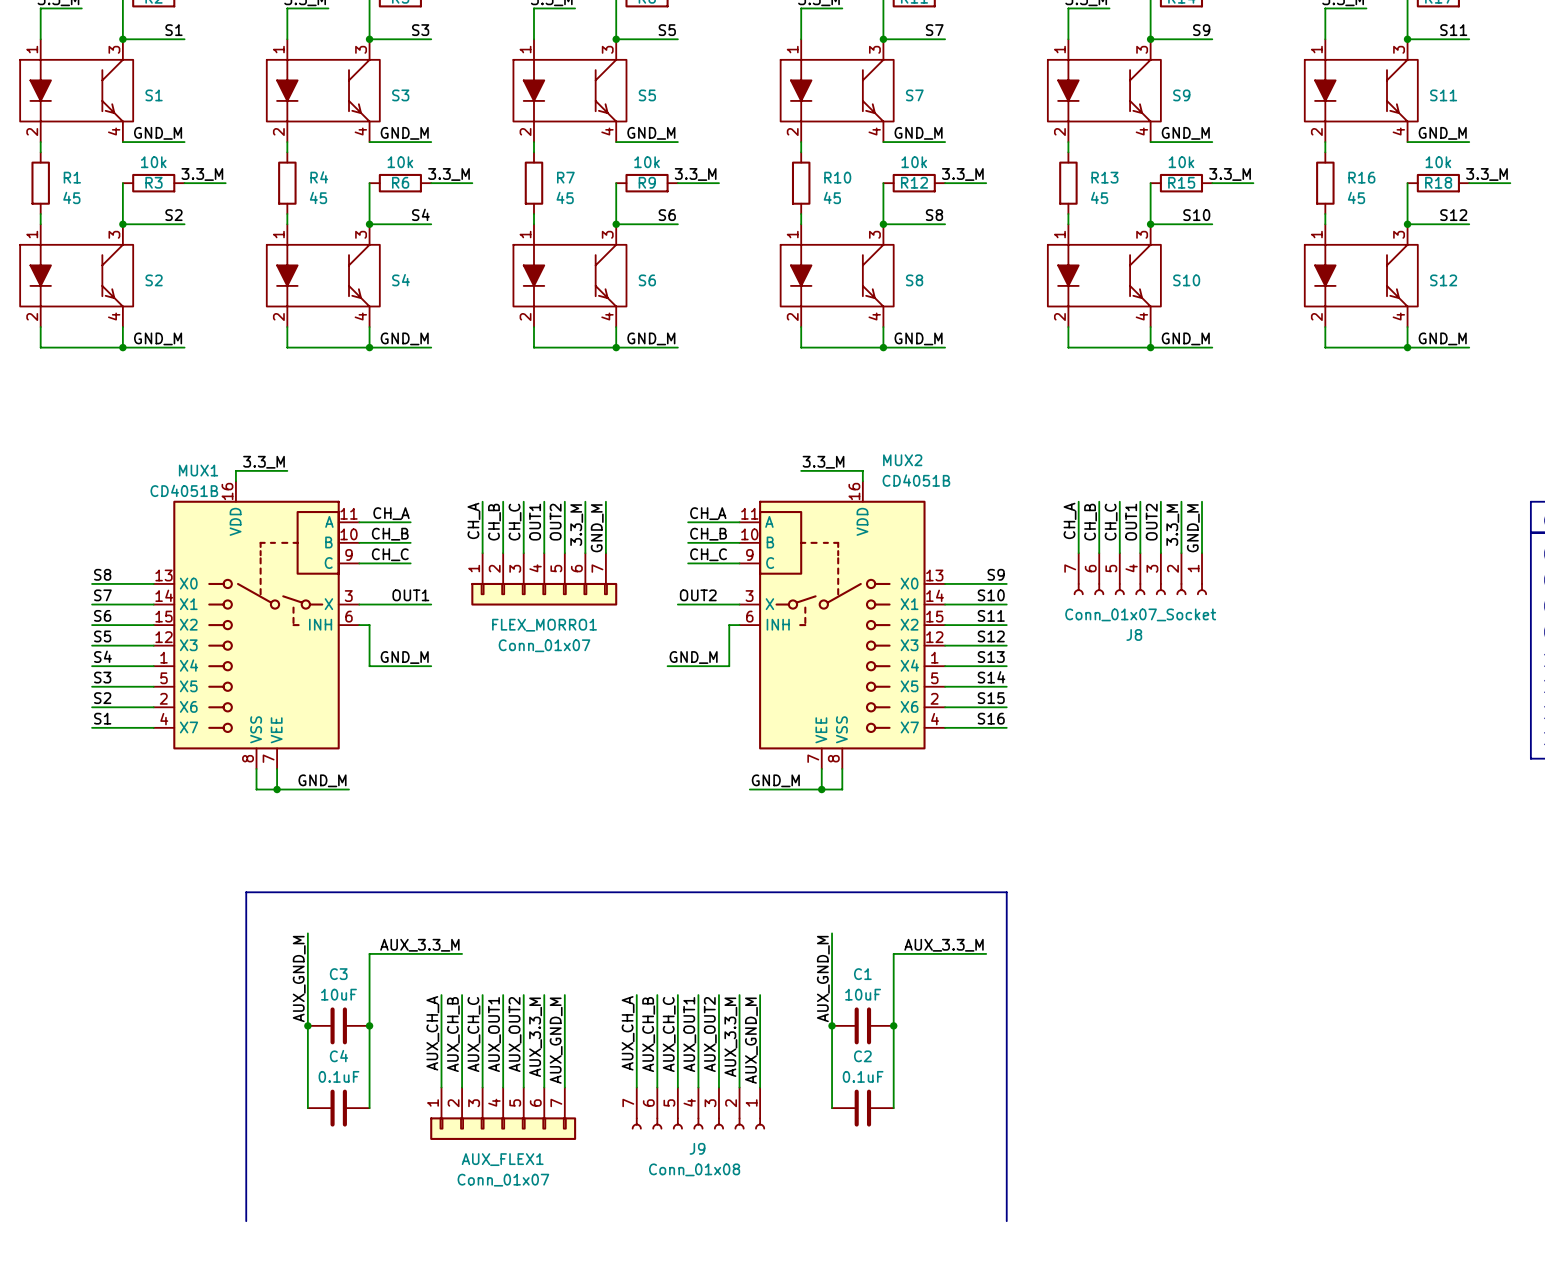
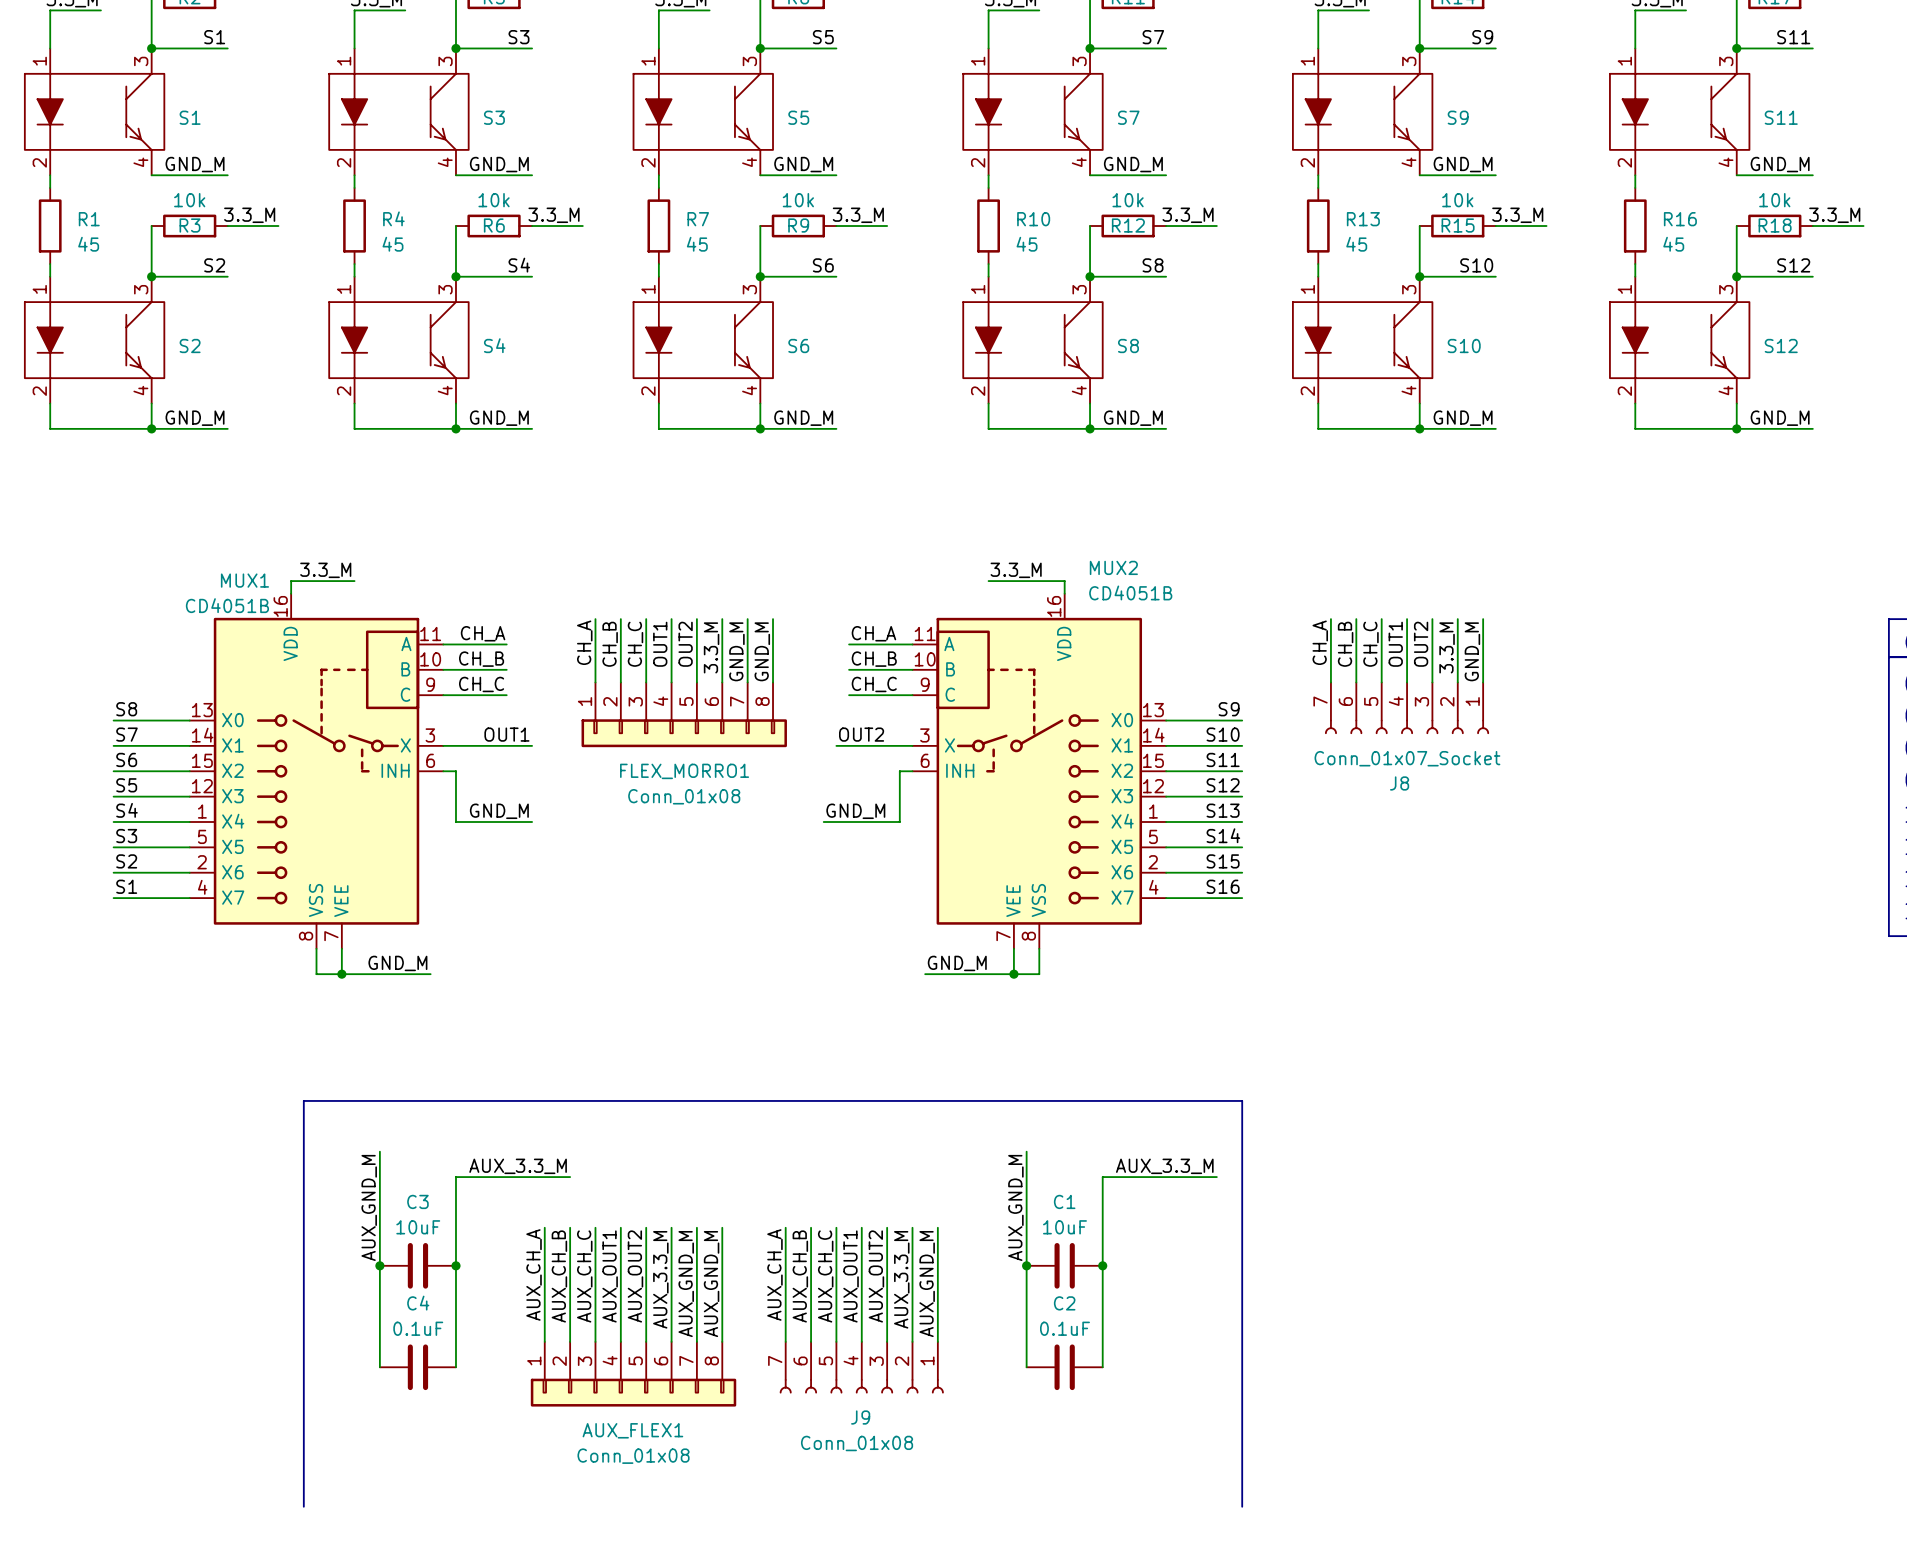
wire: none -> (773, 619) (773, 682)
label: none -> GND_M (762, 651)
FLEX_MORRO1 symbol: [471, 553, 618, 606] -> [581, 682, 787, 748]
FLEX_MORRO1 value: Conn_01x07 (544, 645) -> Conn_01x08 (684, 796)
wire: none -> (722, 1227) (722, 1341)
label: none -> AUX_GND_M (711, 1284)
AUX_FLEX1 symbol: [430, 1087, 577, 1140] -> [530, 1341, 737, 1407]
AUX_FLEX1 value: Conn_01x07 (503, 1180) -> Conn_01x08 (633, 1456)

